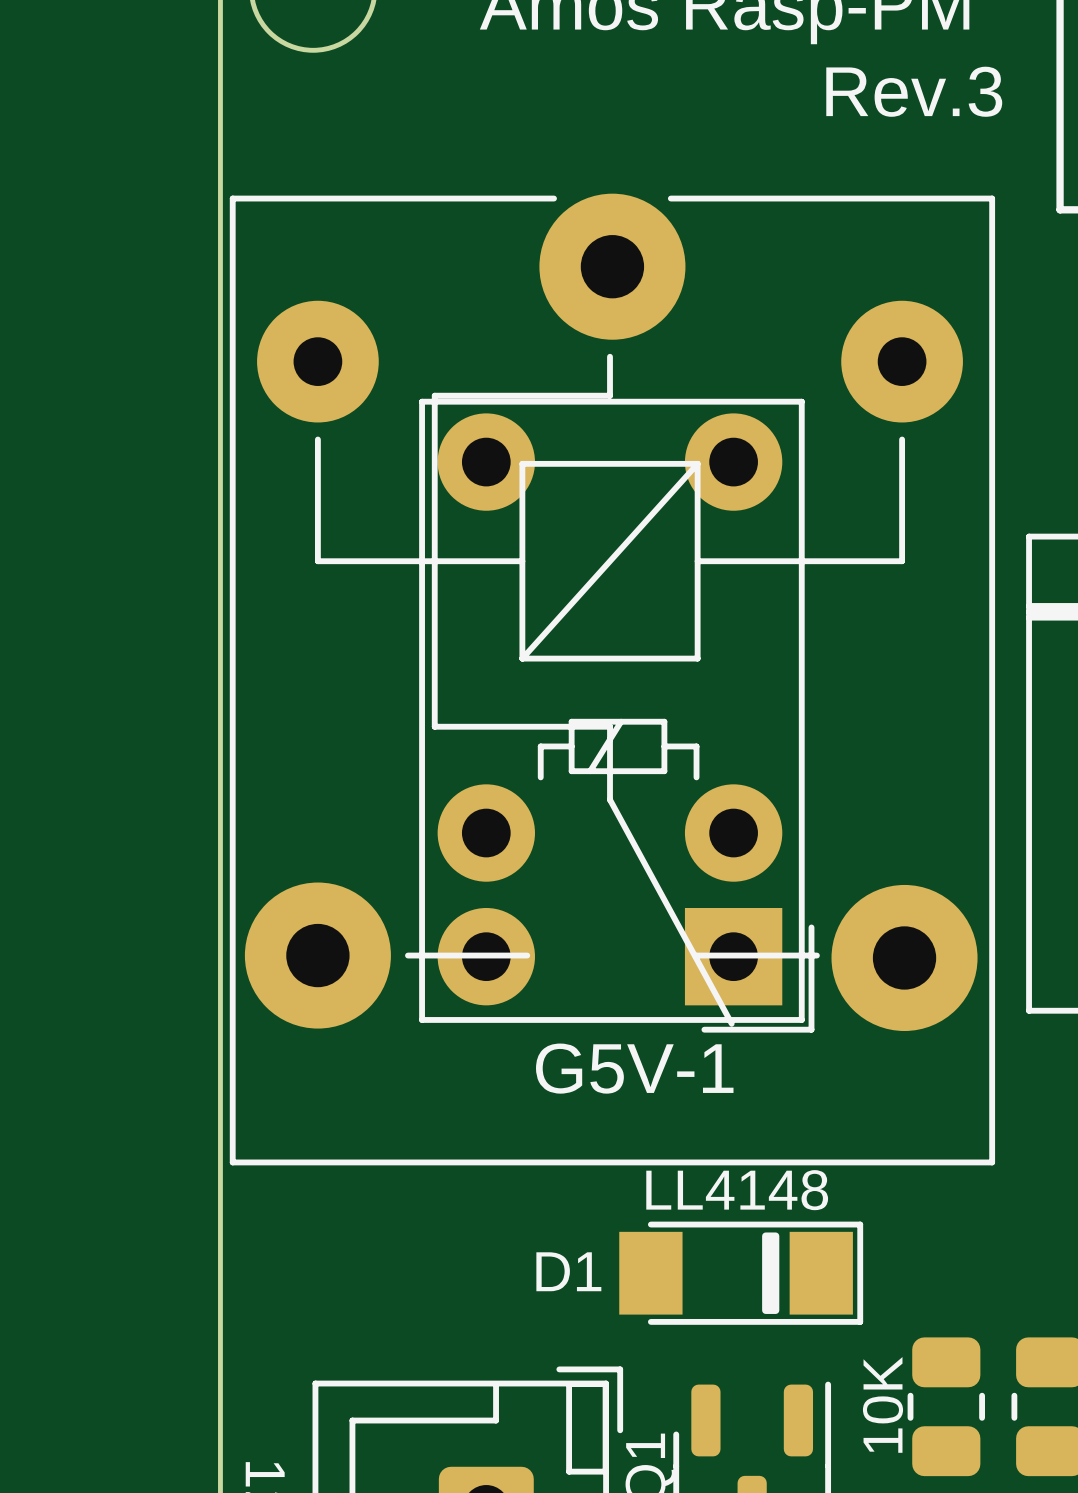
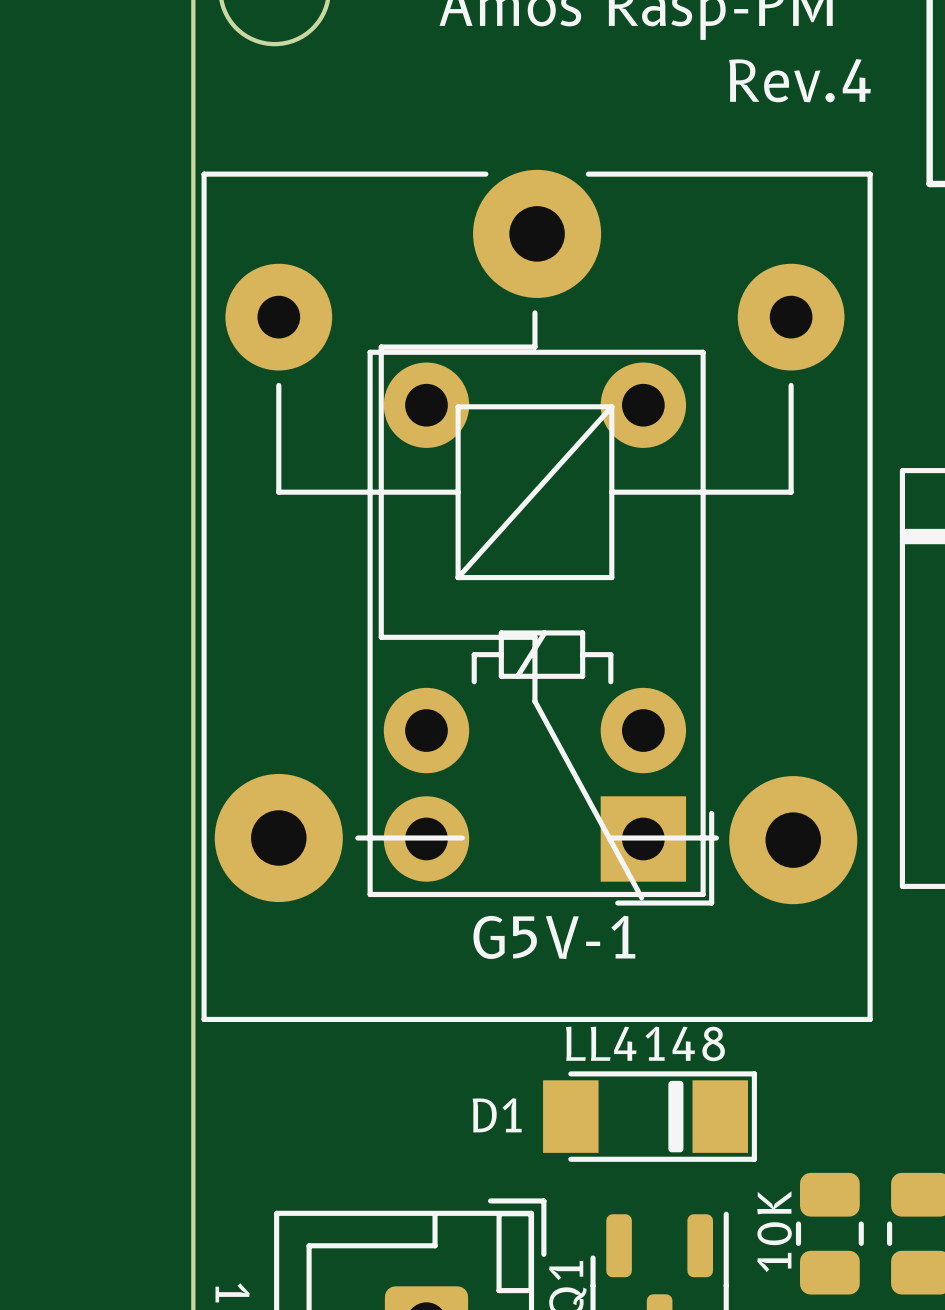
text: Rev.3 (914, 91) -> Rev.4 (799, 80)

